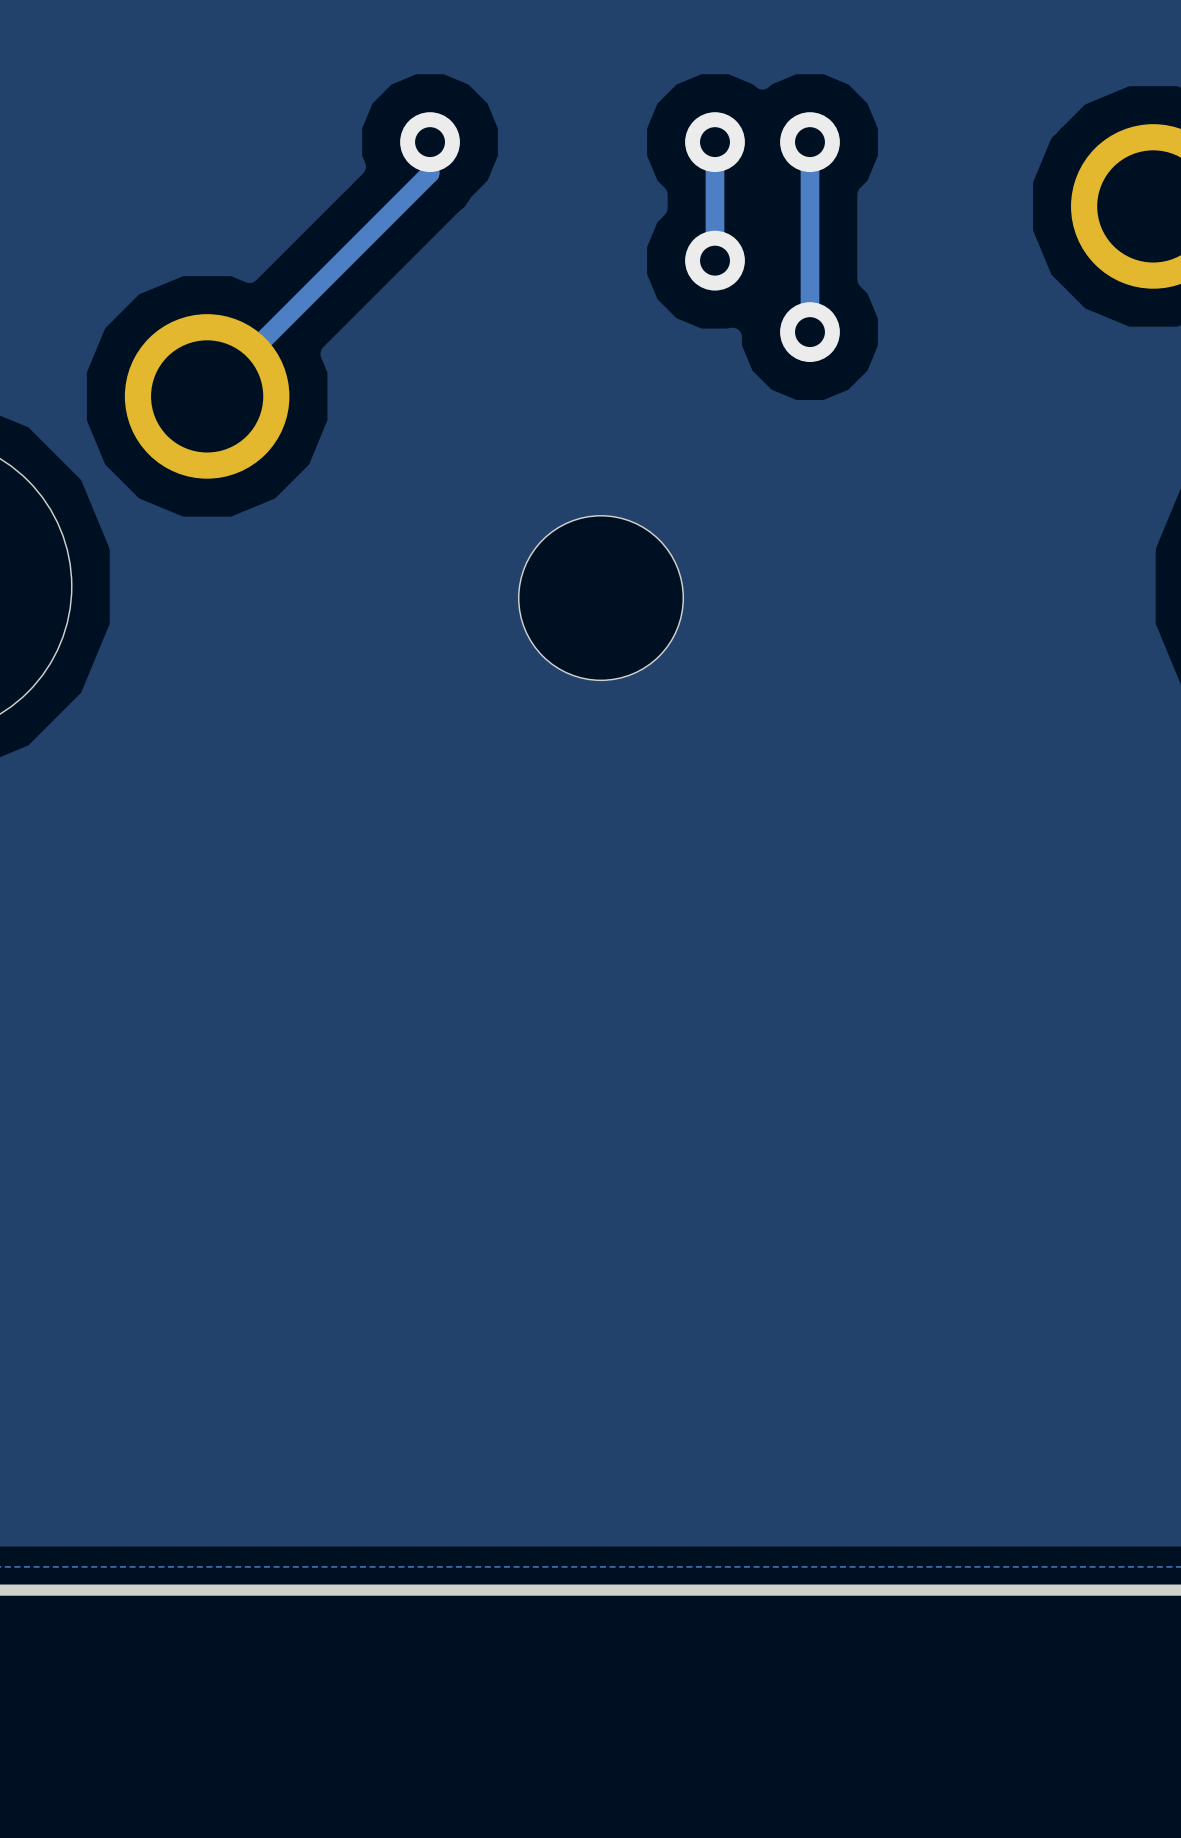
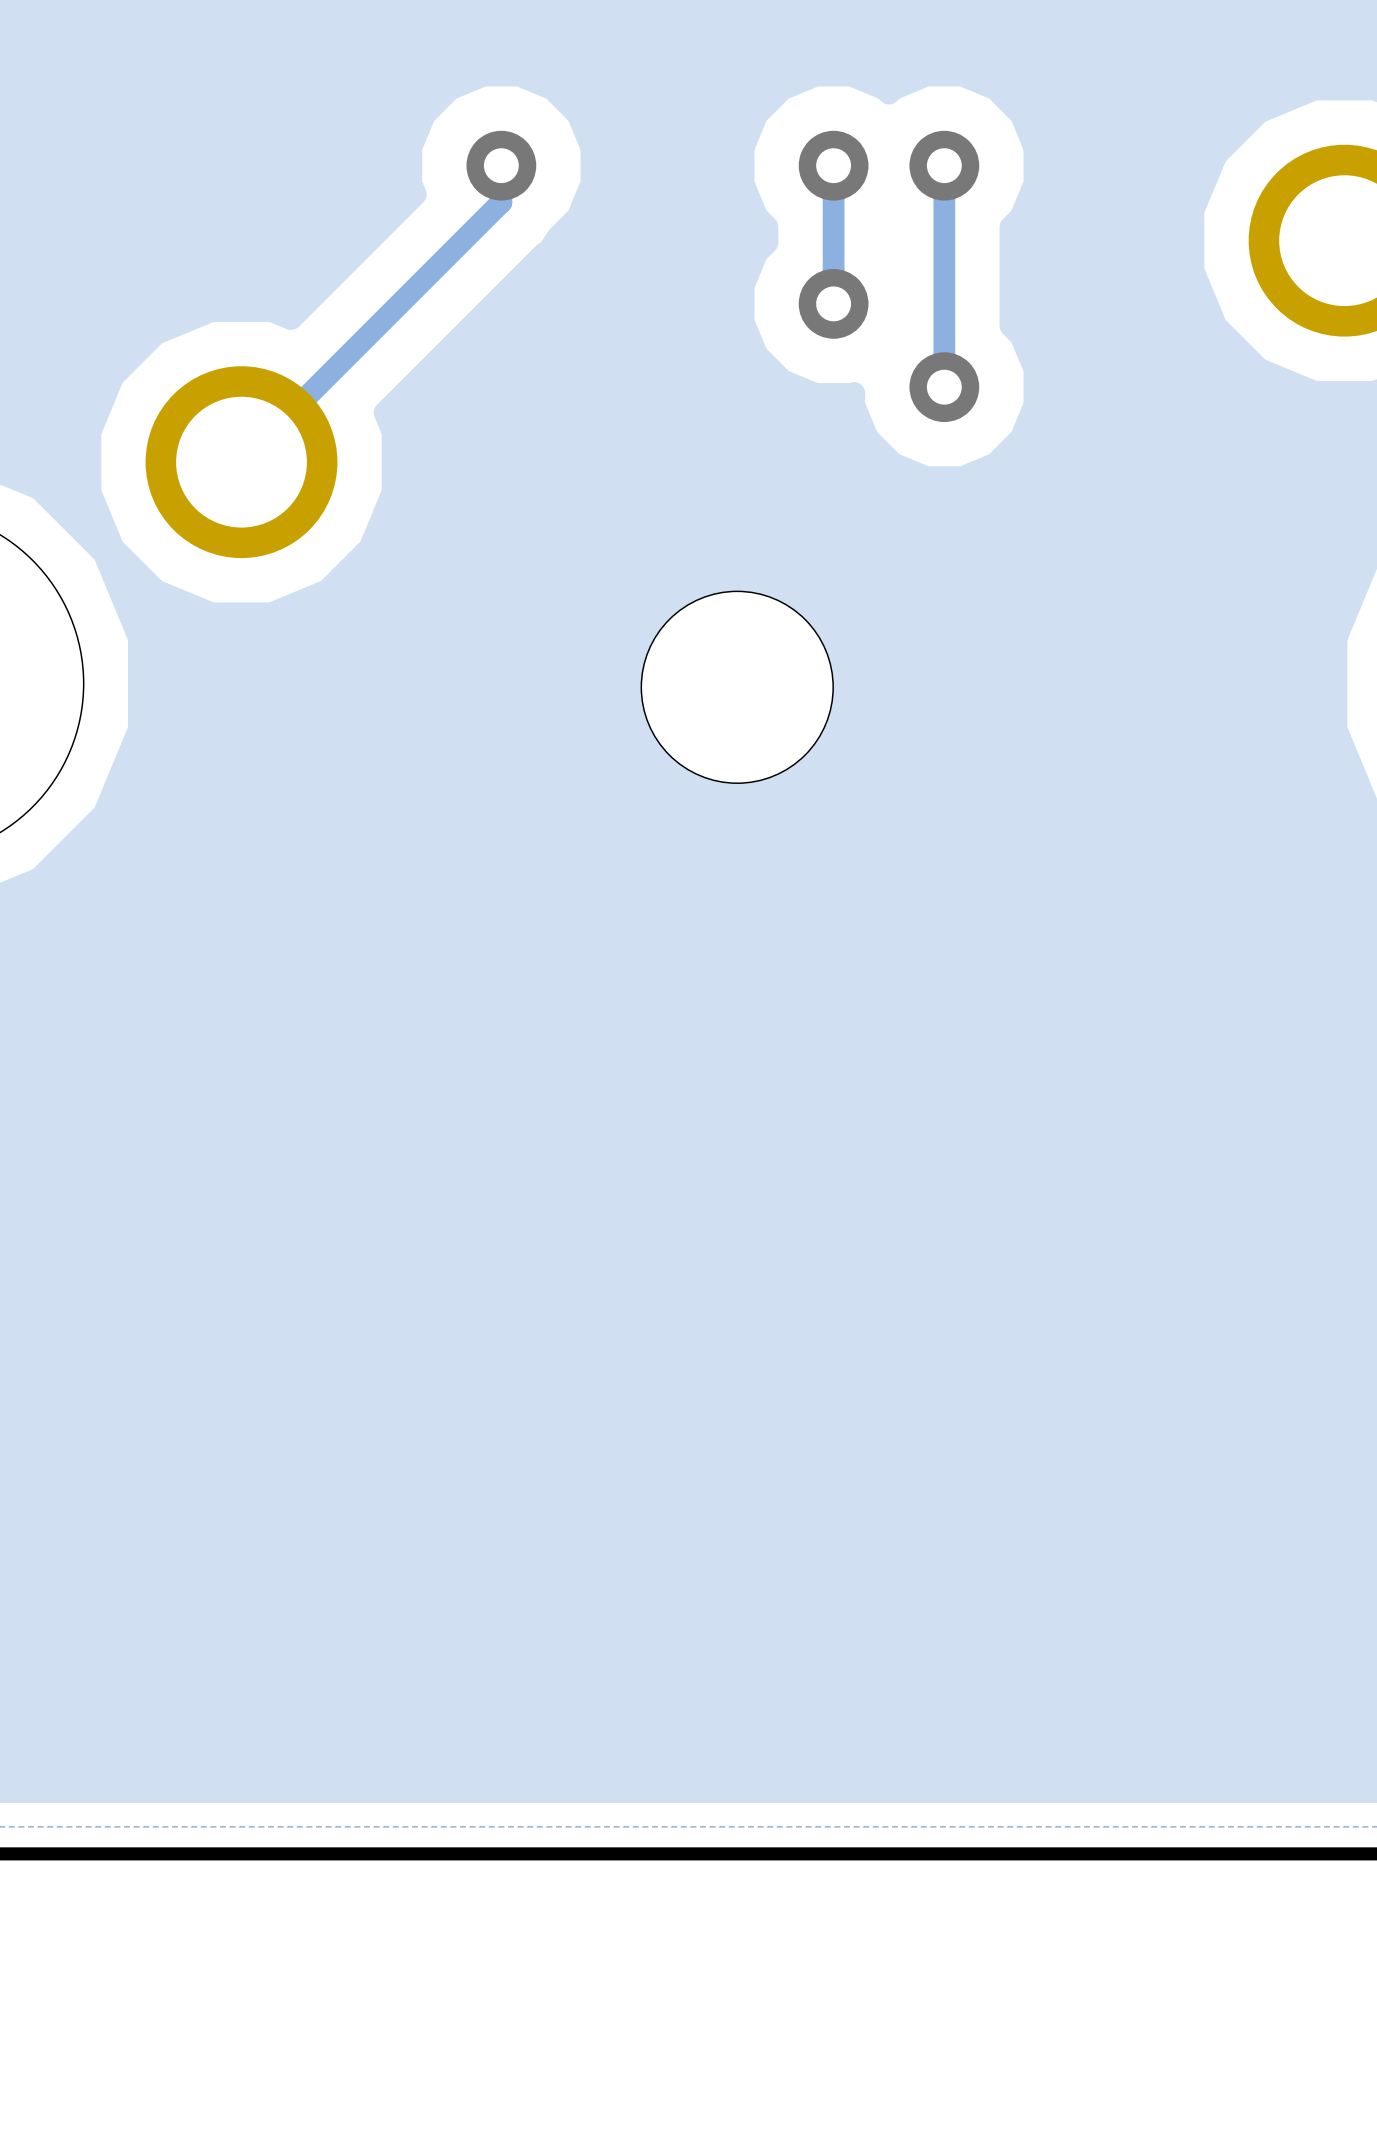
part position: (601, 598) -> (737, 687)

